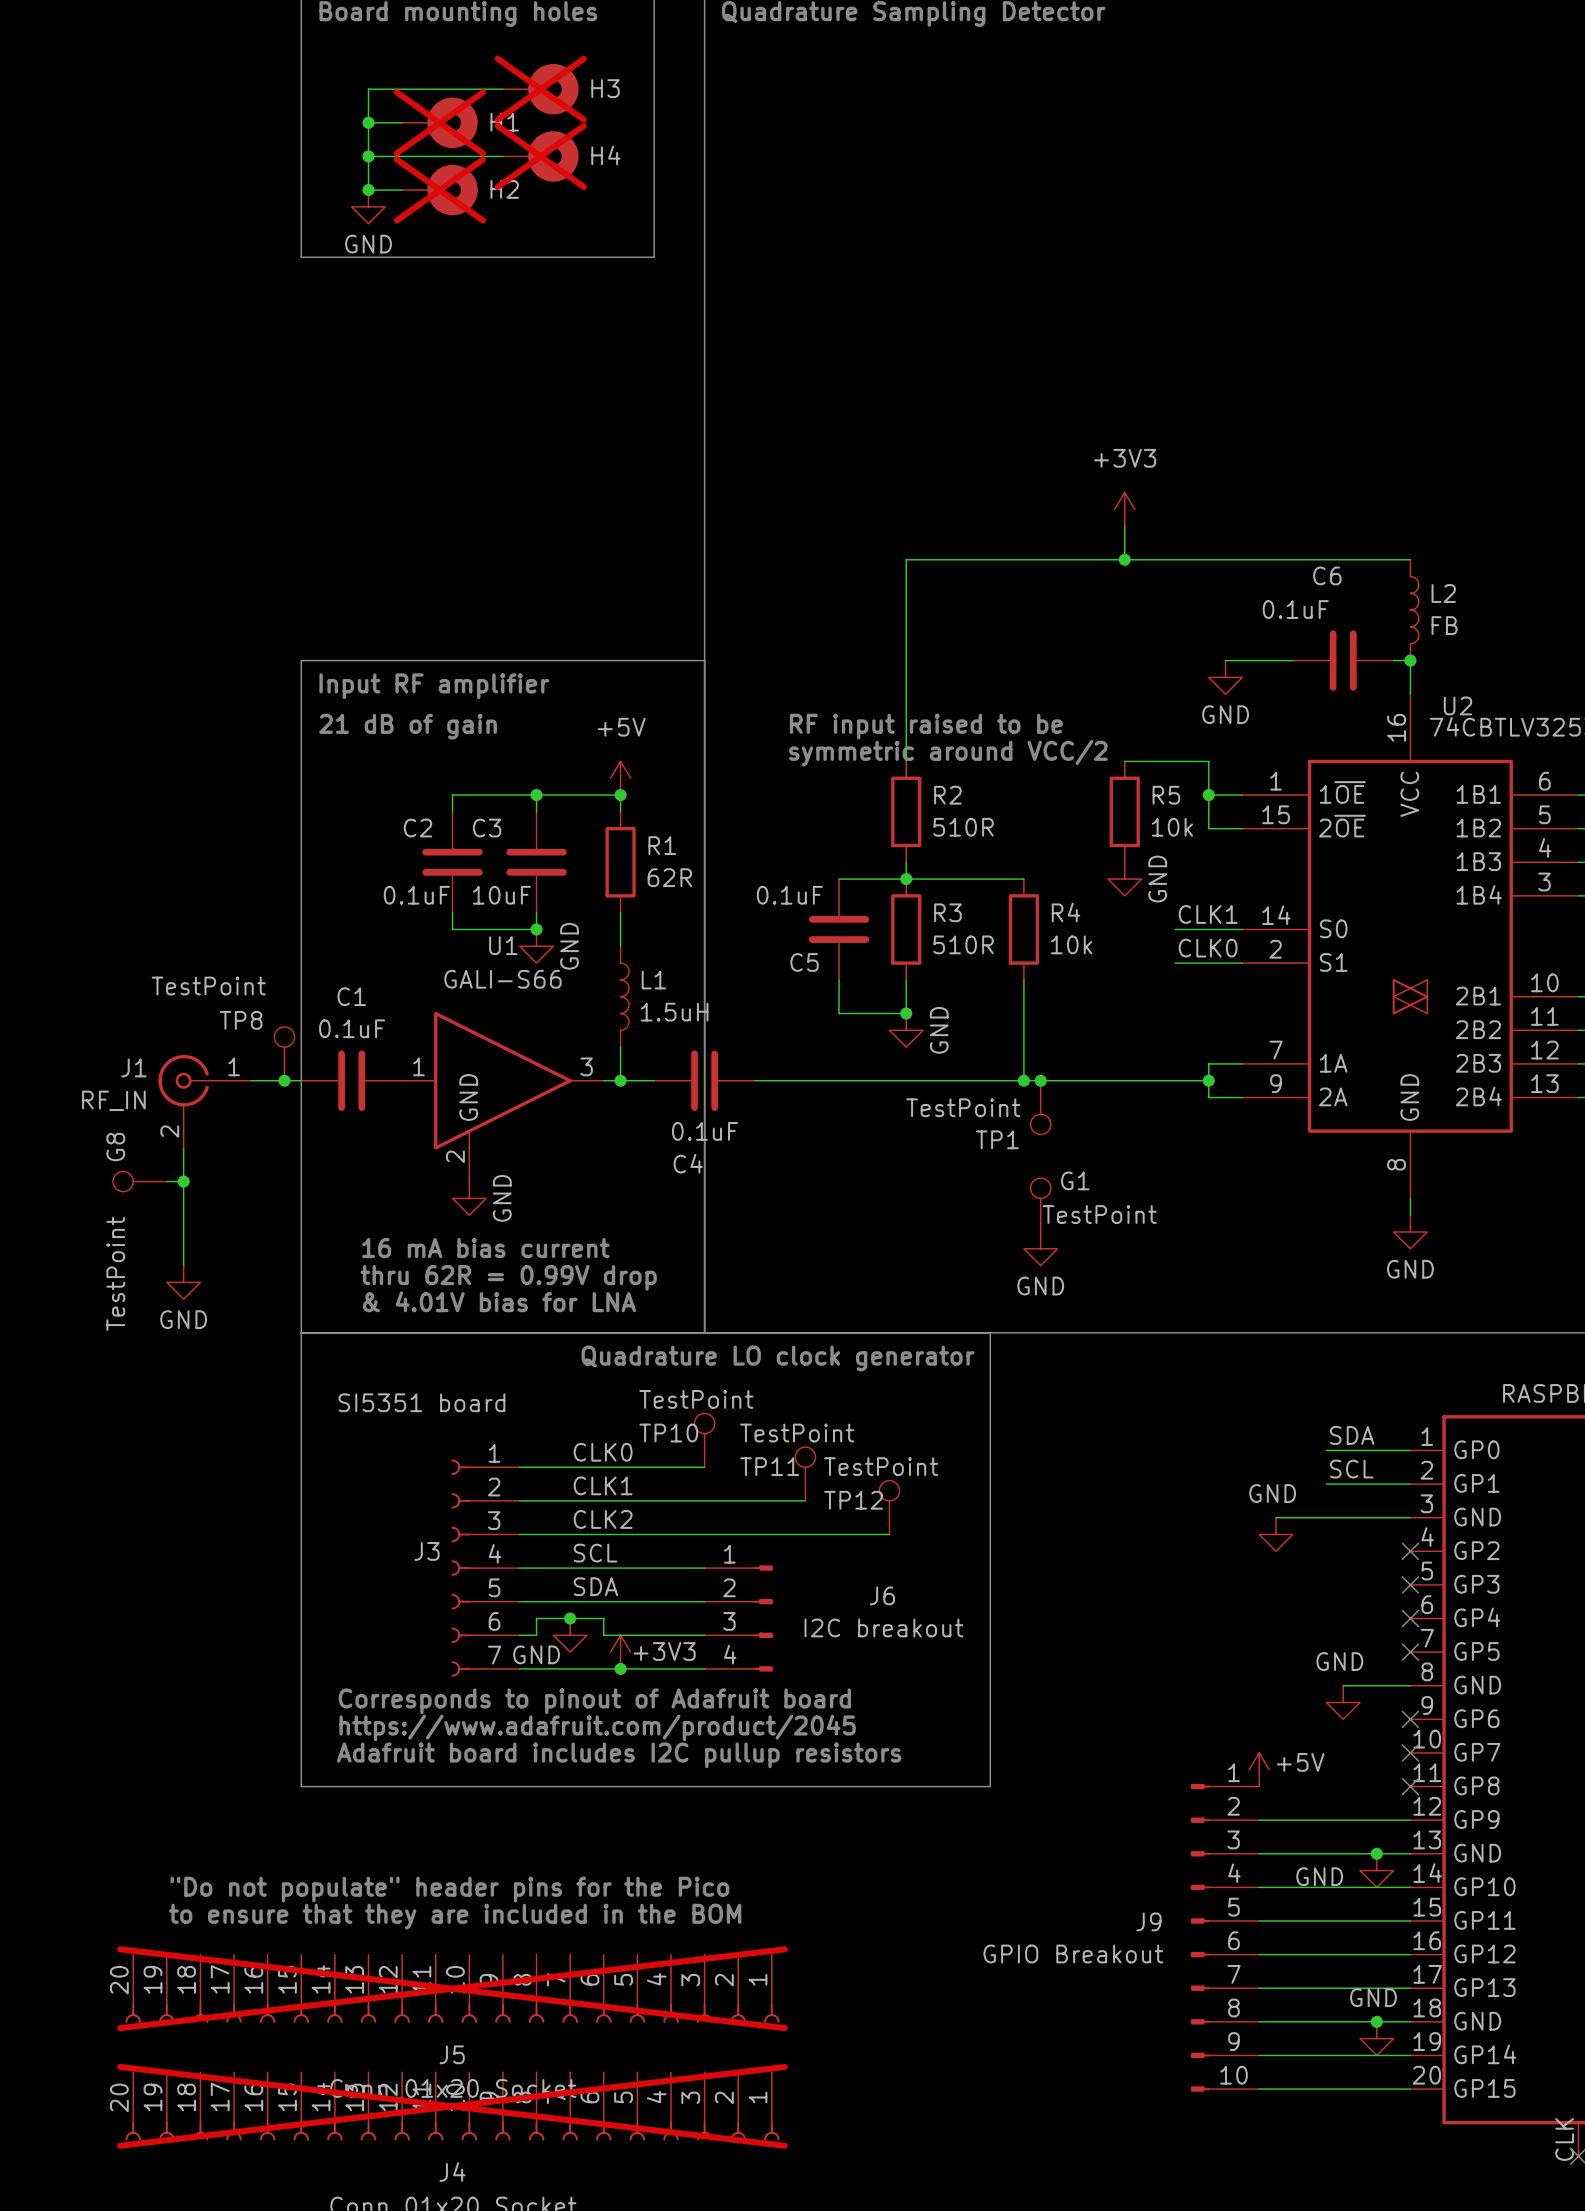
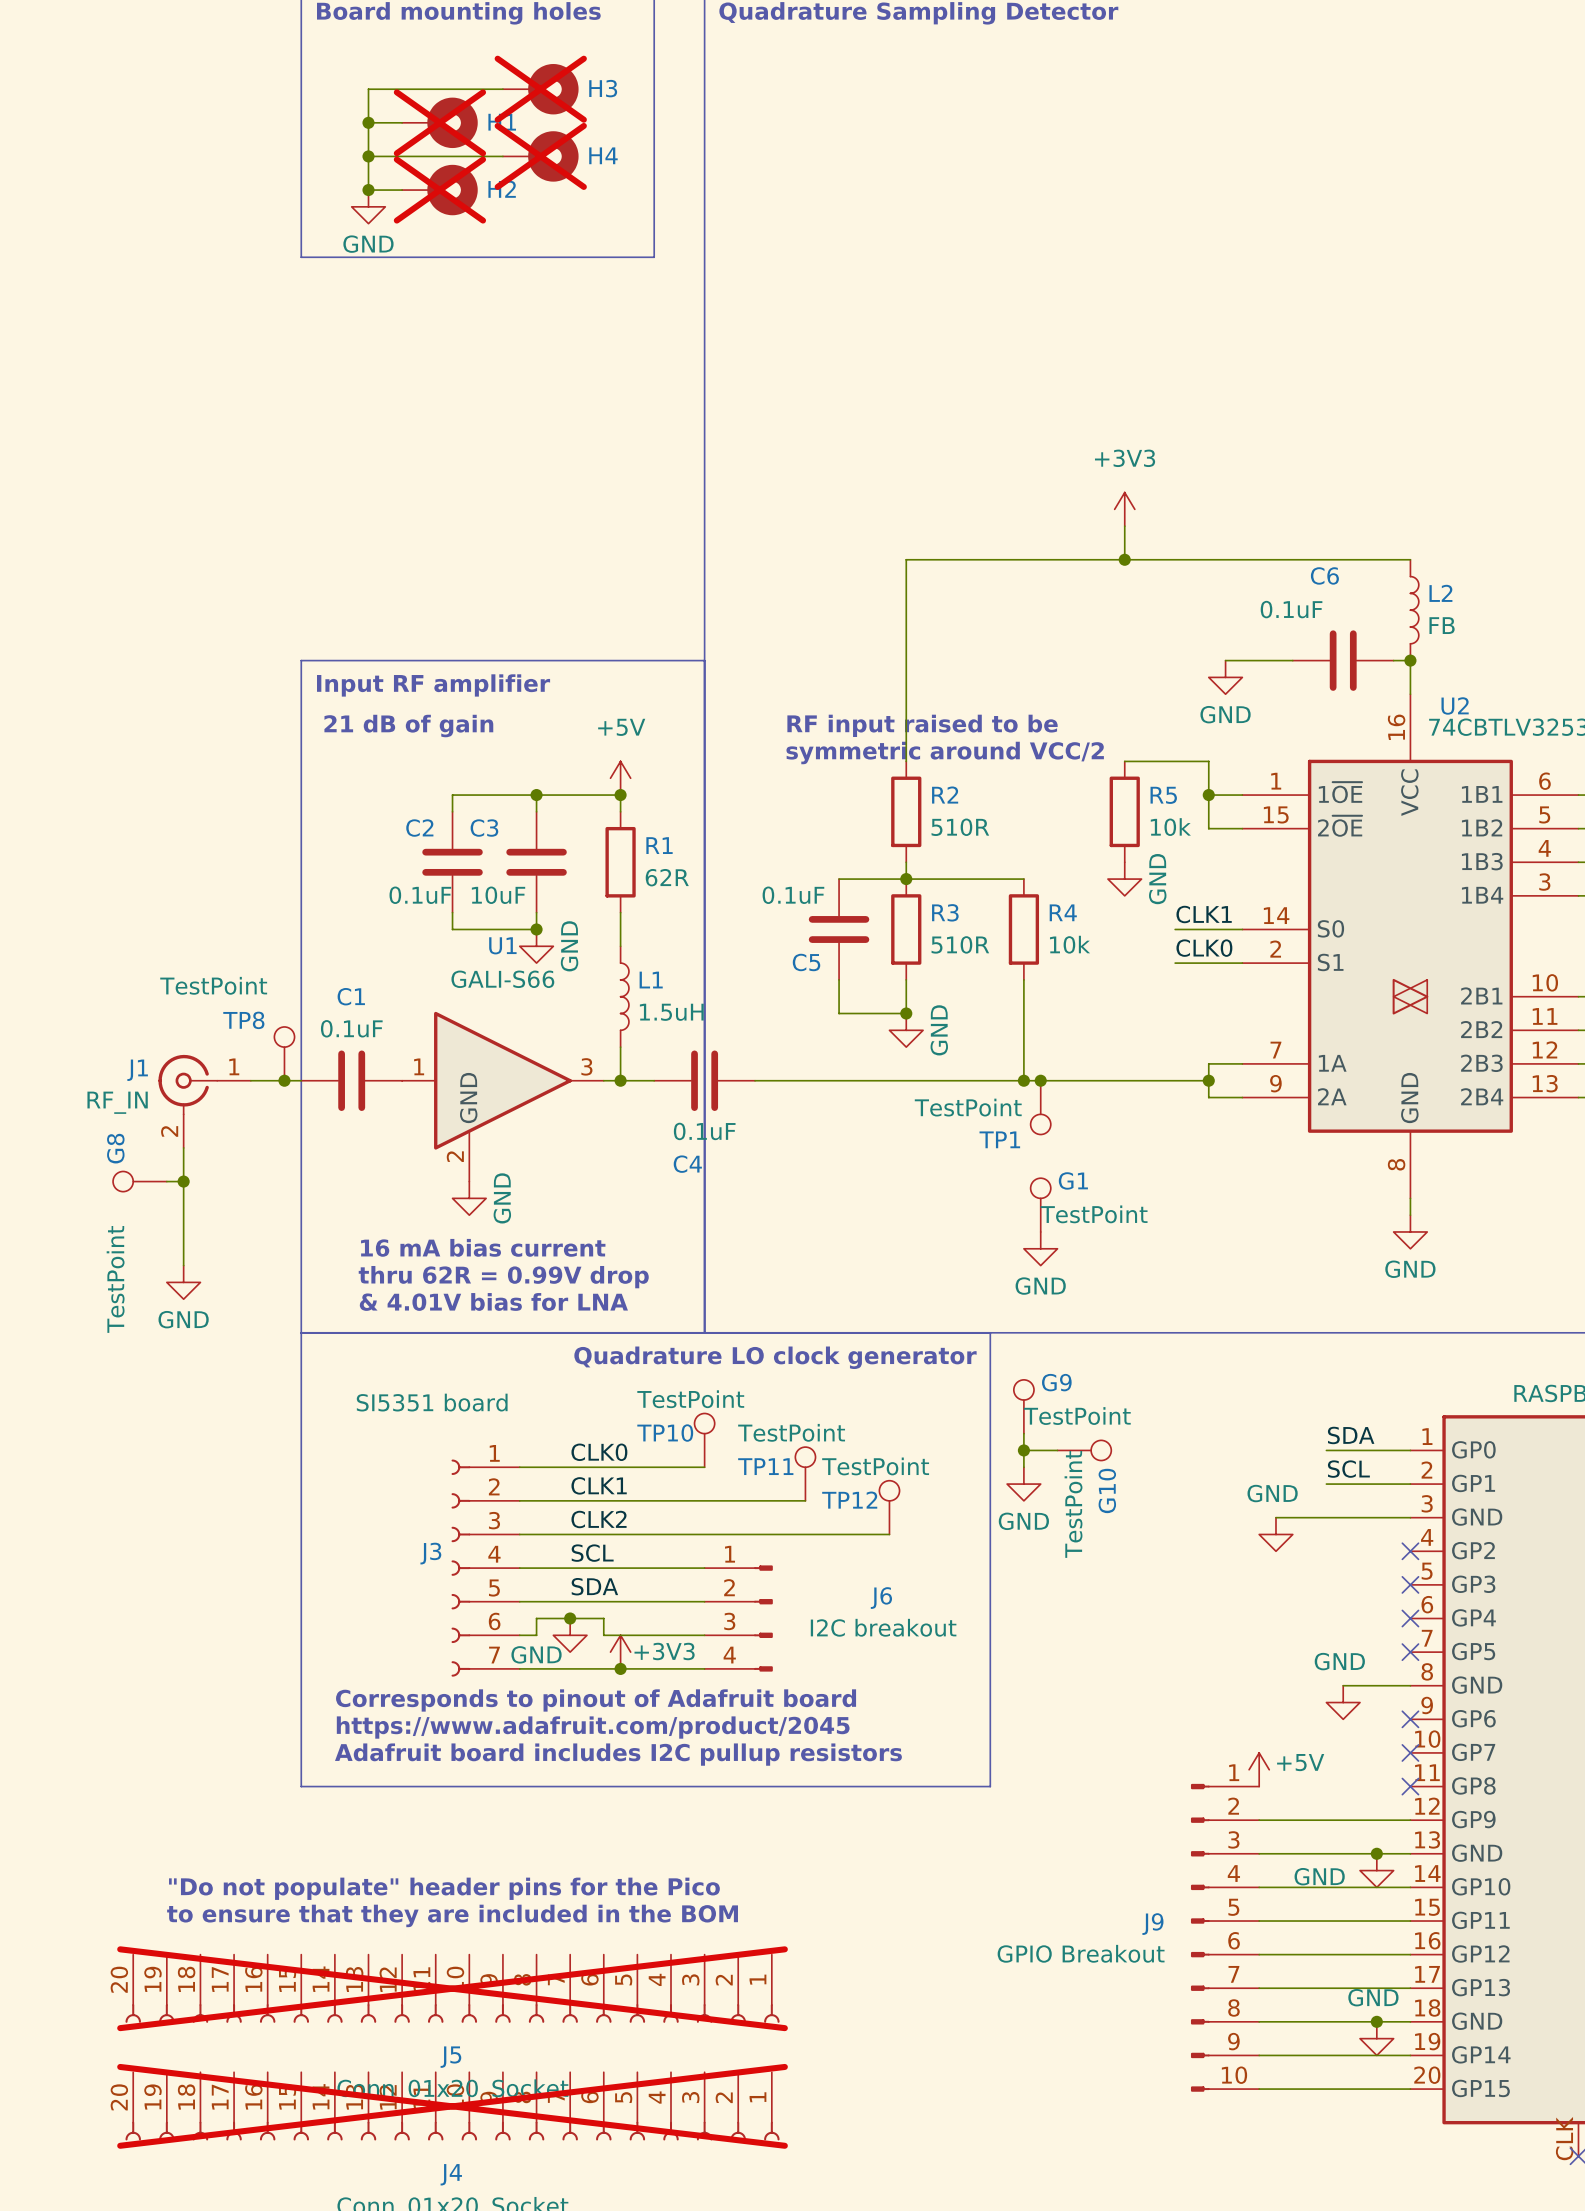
G9: none -> TestPoint (1023, 1406)
wire: none -> (1023, 1433) (1023, 1467)
wire: none -> (1023, 1450) (1057, 1450)
junction: none -> (1023, 1450)
G10: none -> TestPoint (1084, 1450)
power symbol: none -> GND (1023, 1484)

